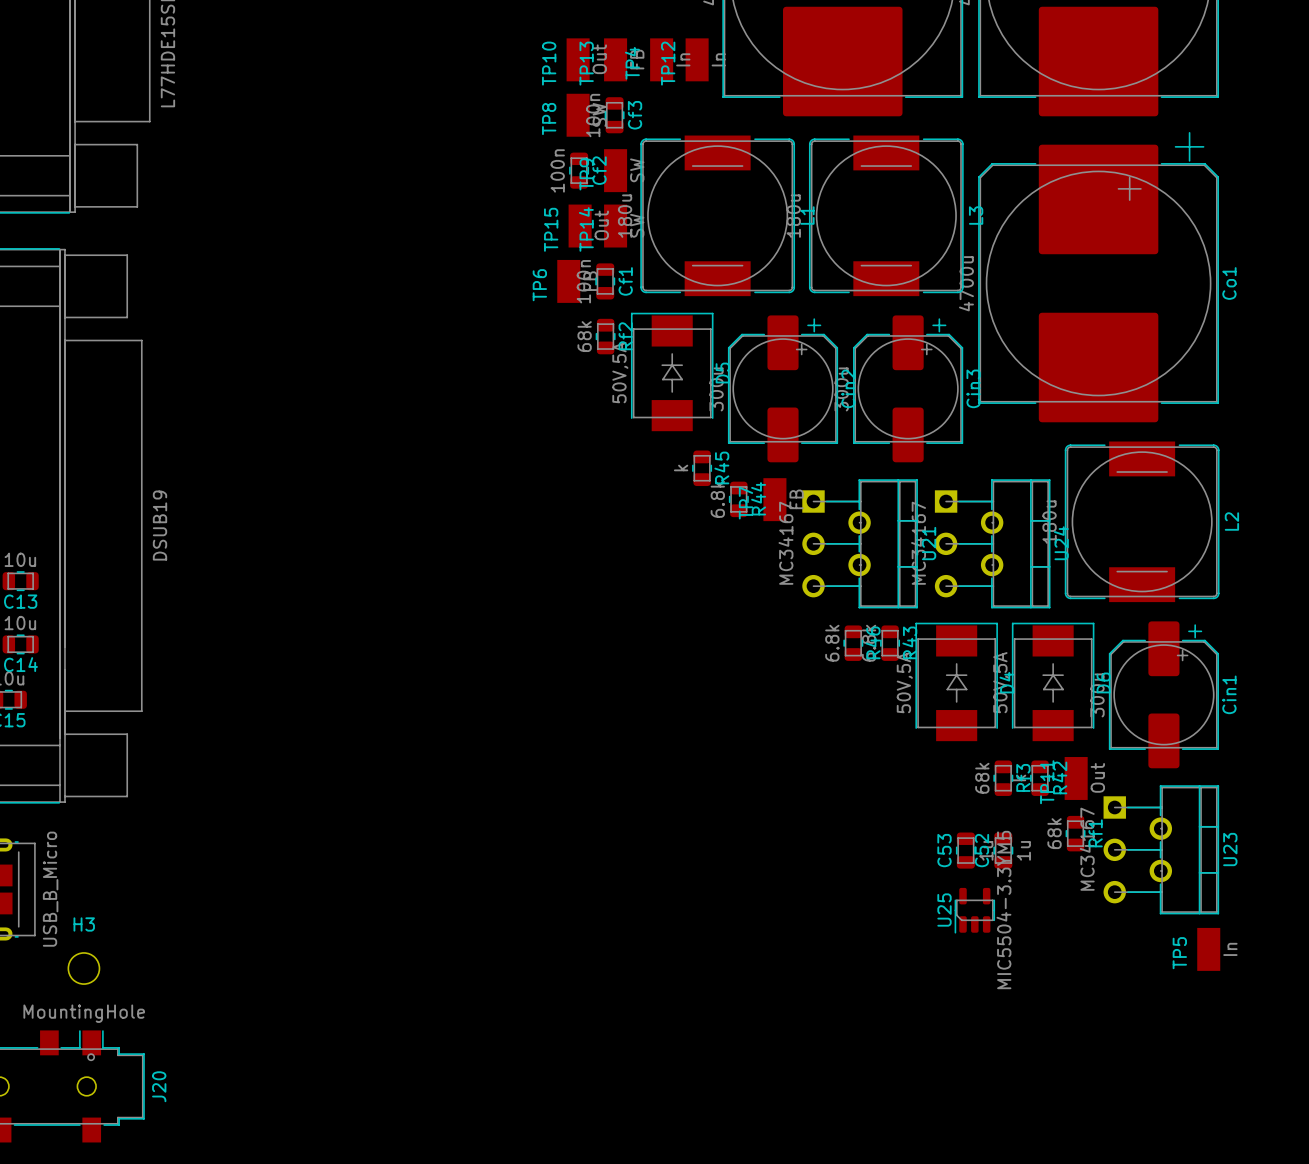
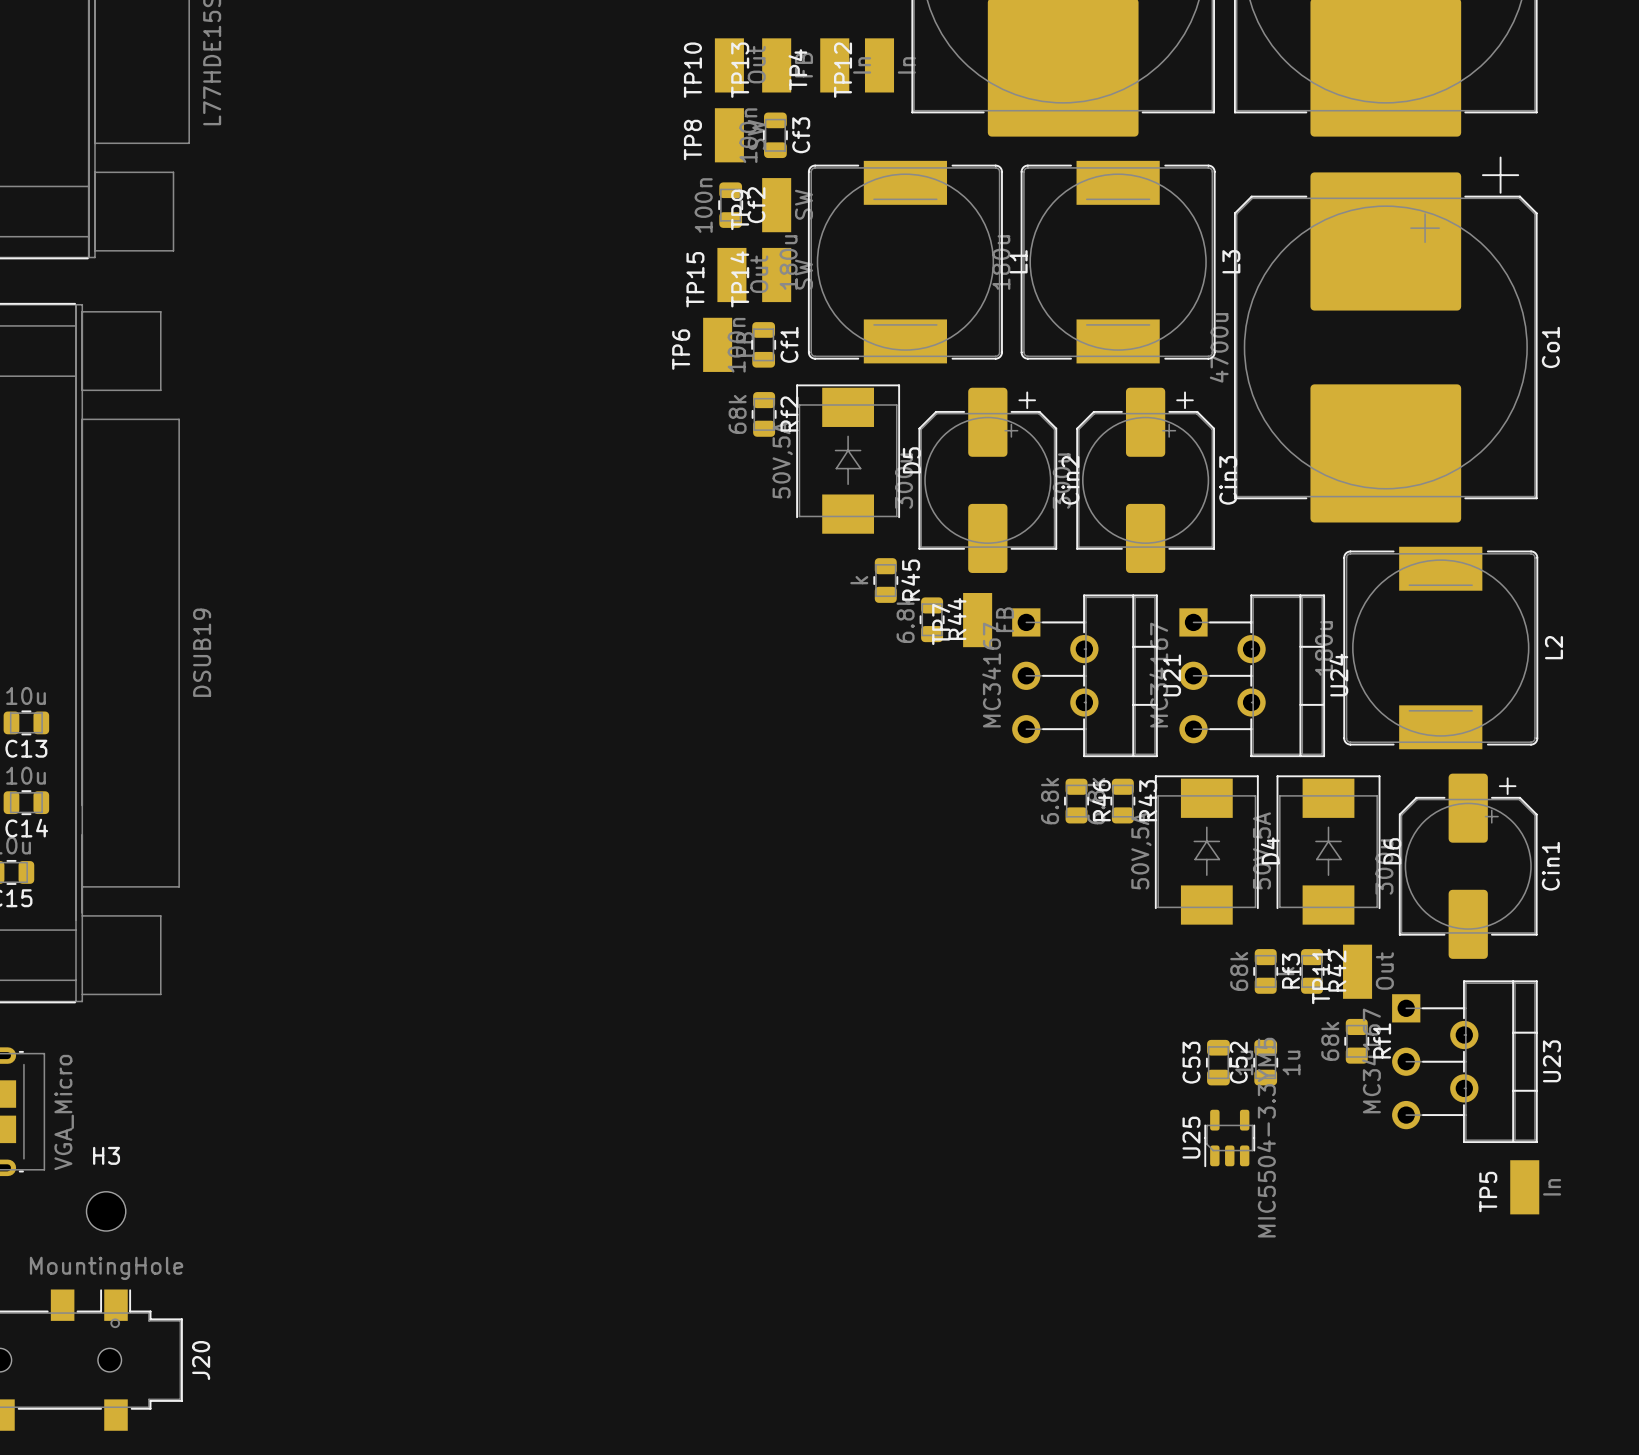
part value: USB_B_Micro (50, 889) -> VGA_Micro (64, 1112)

